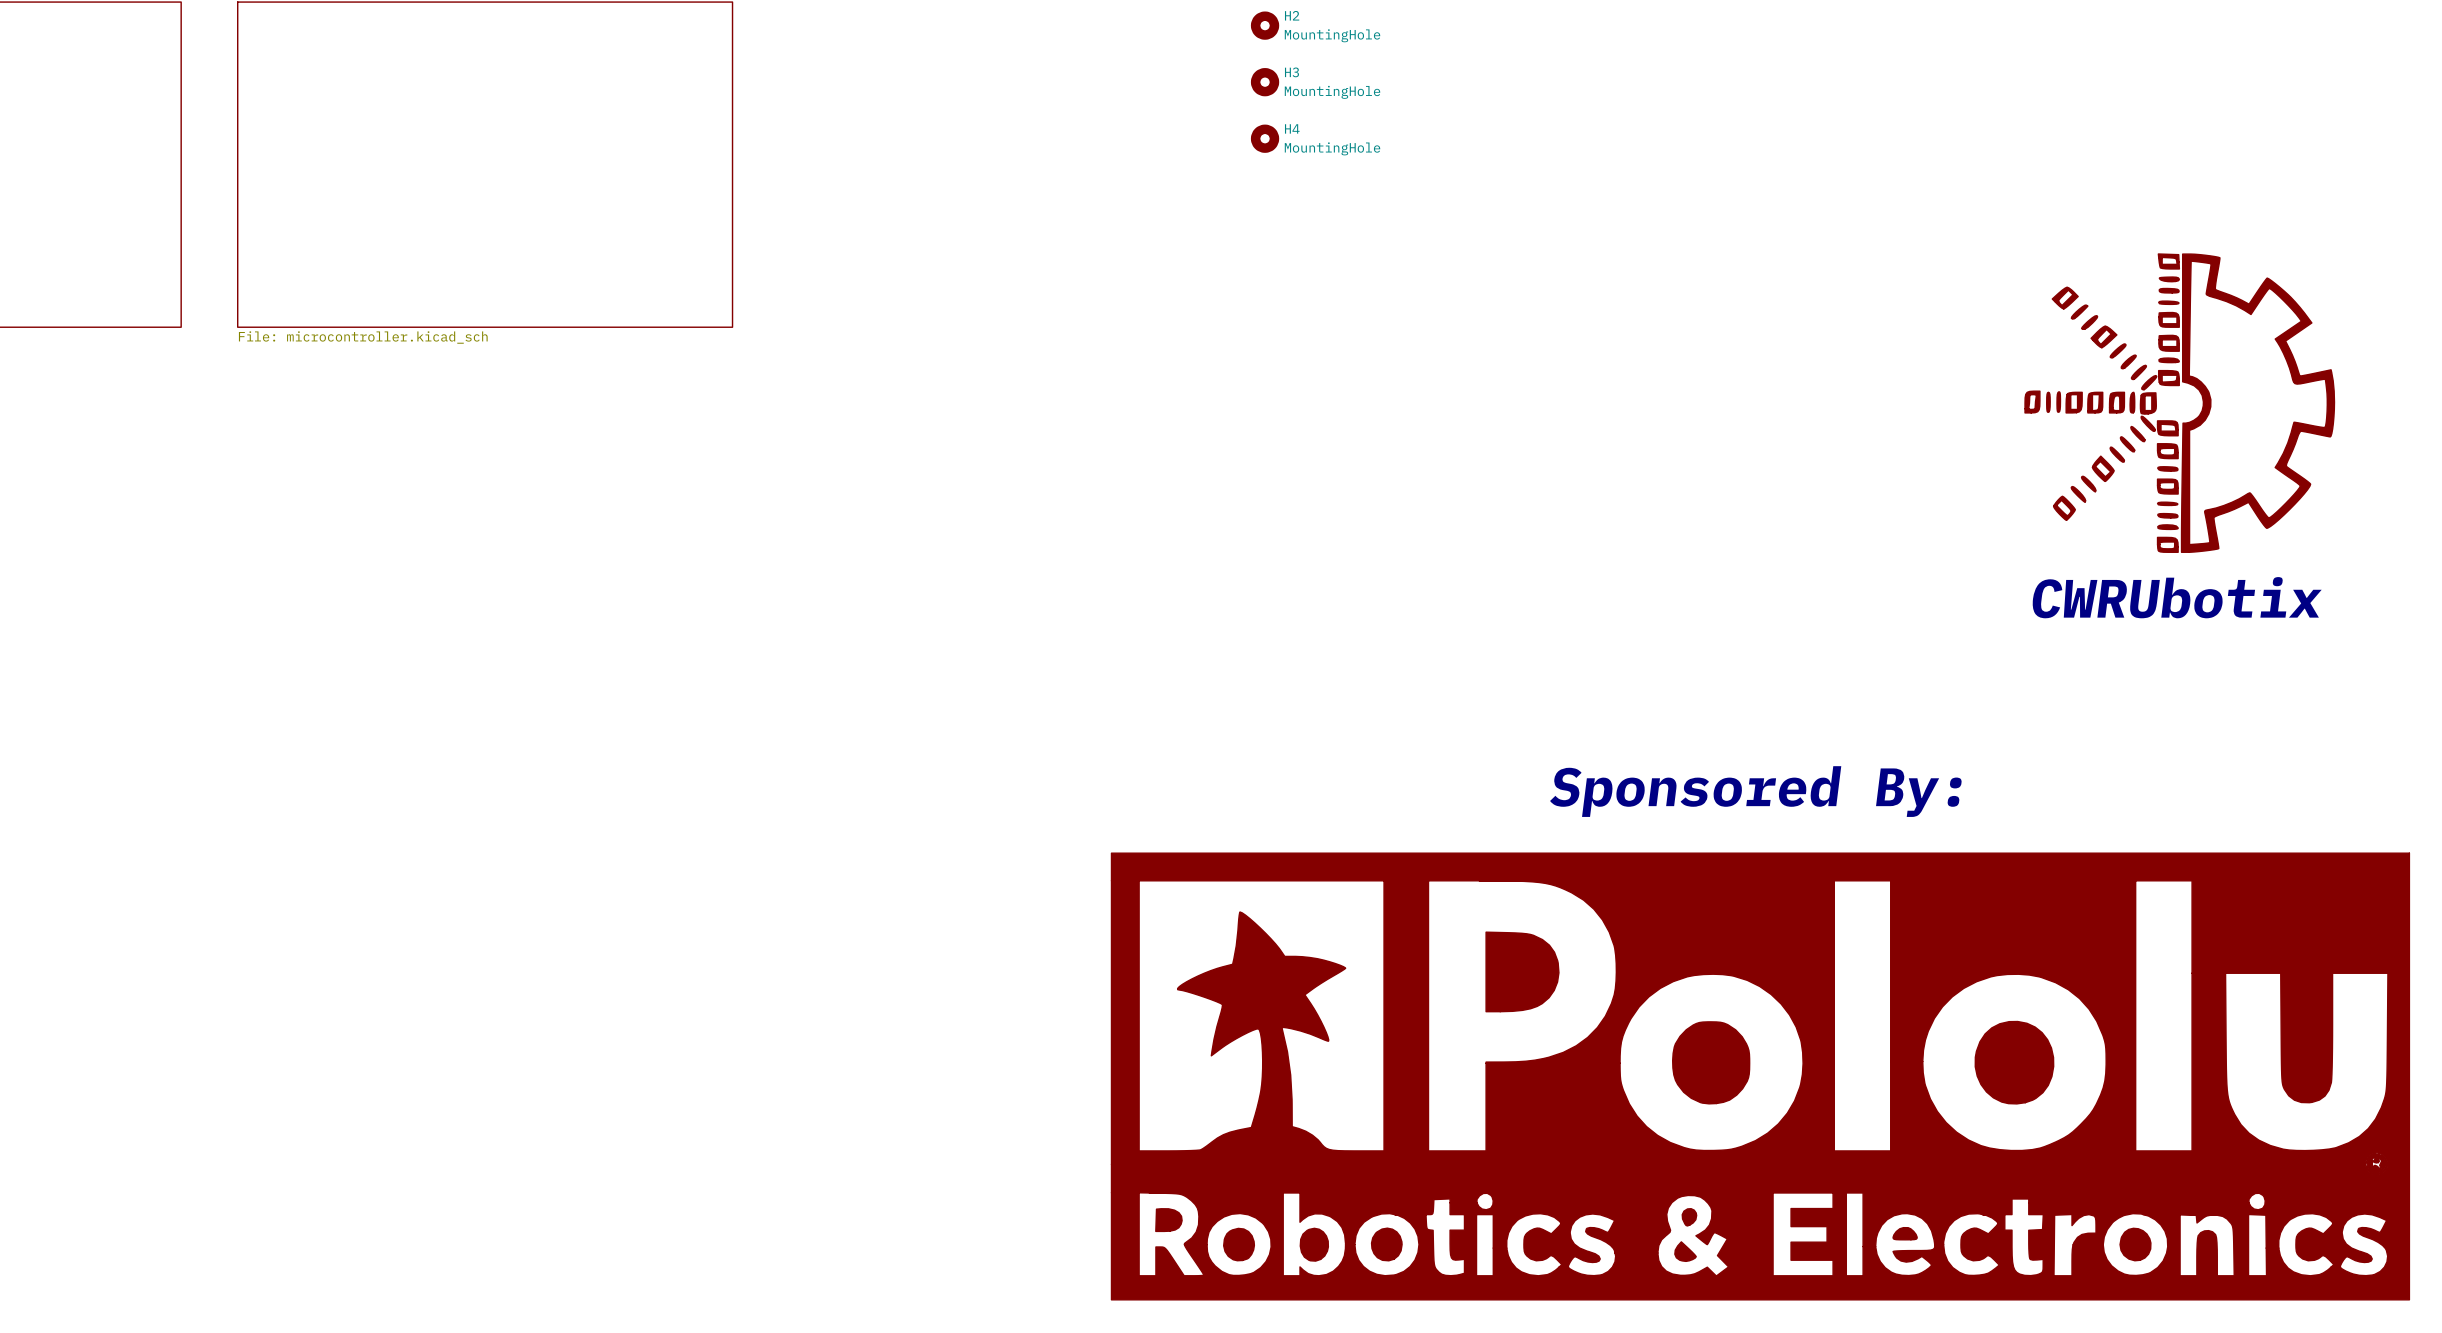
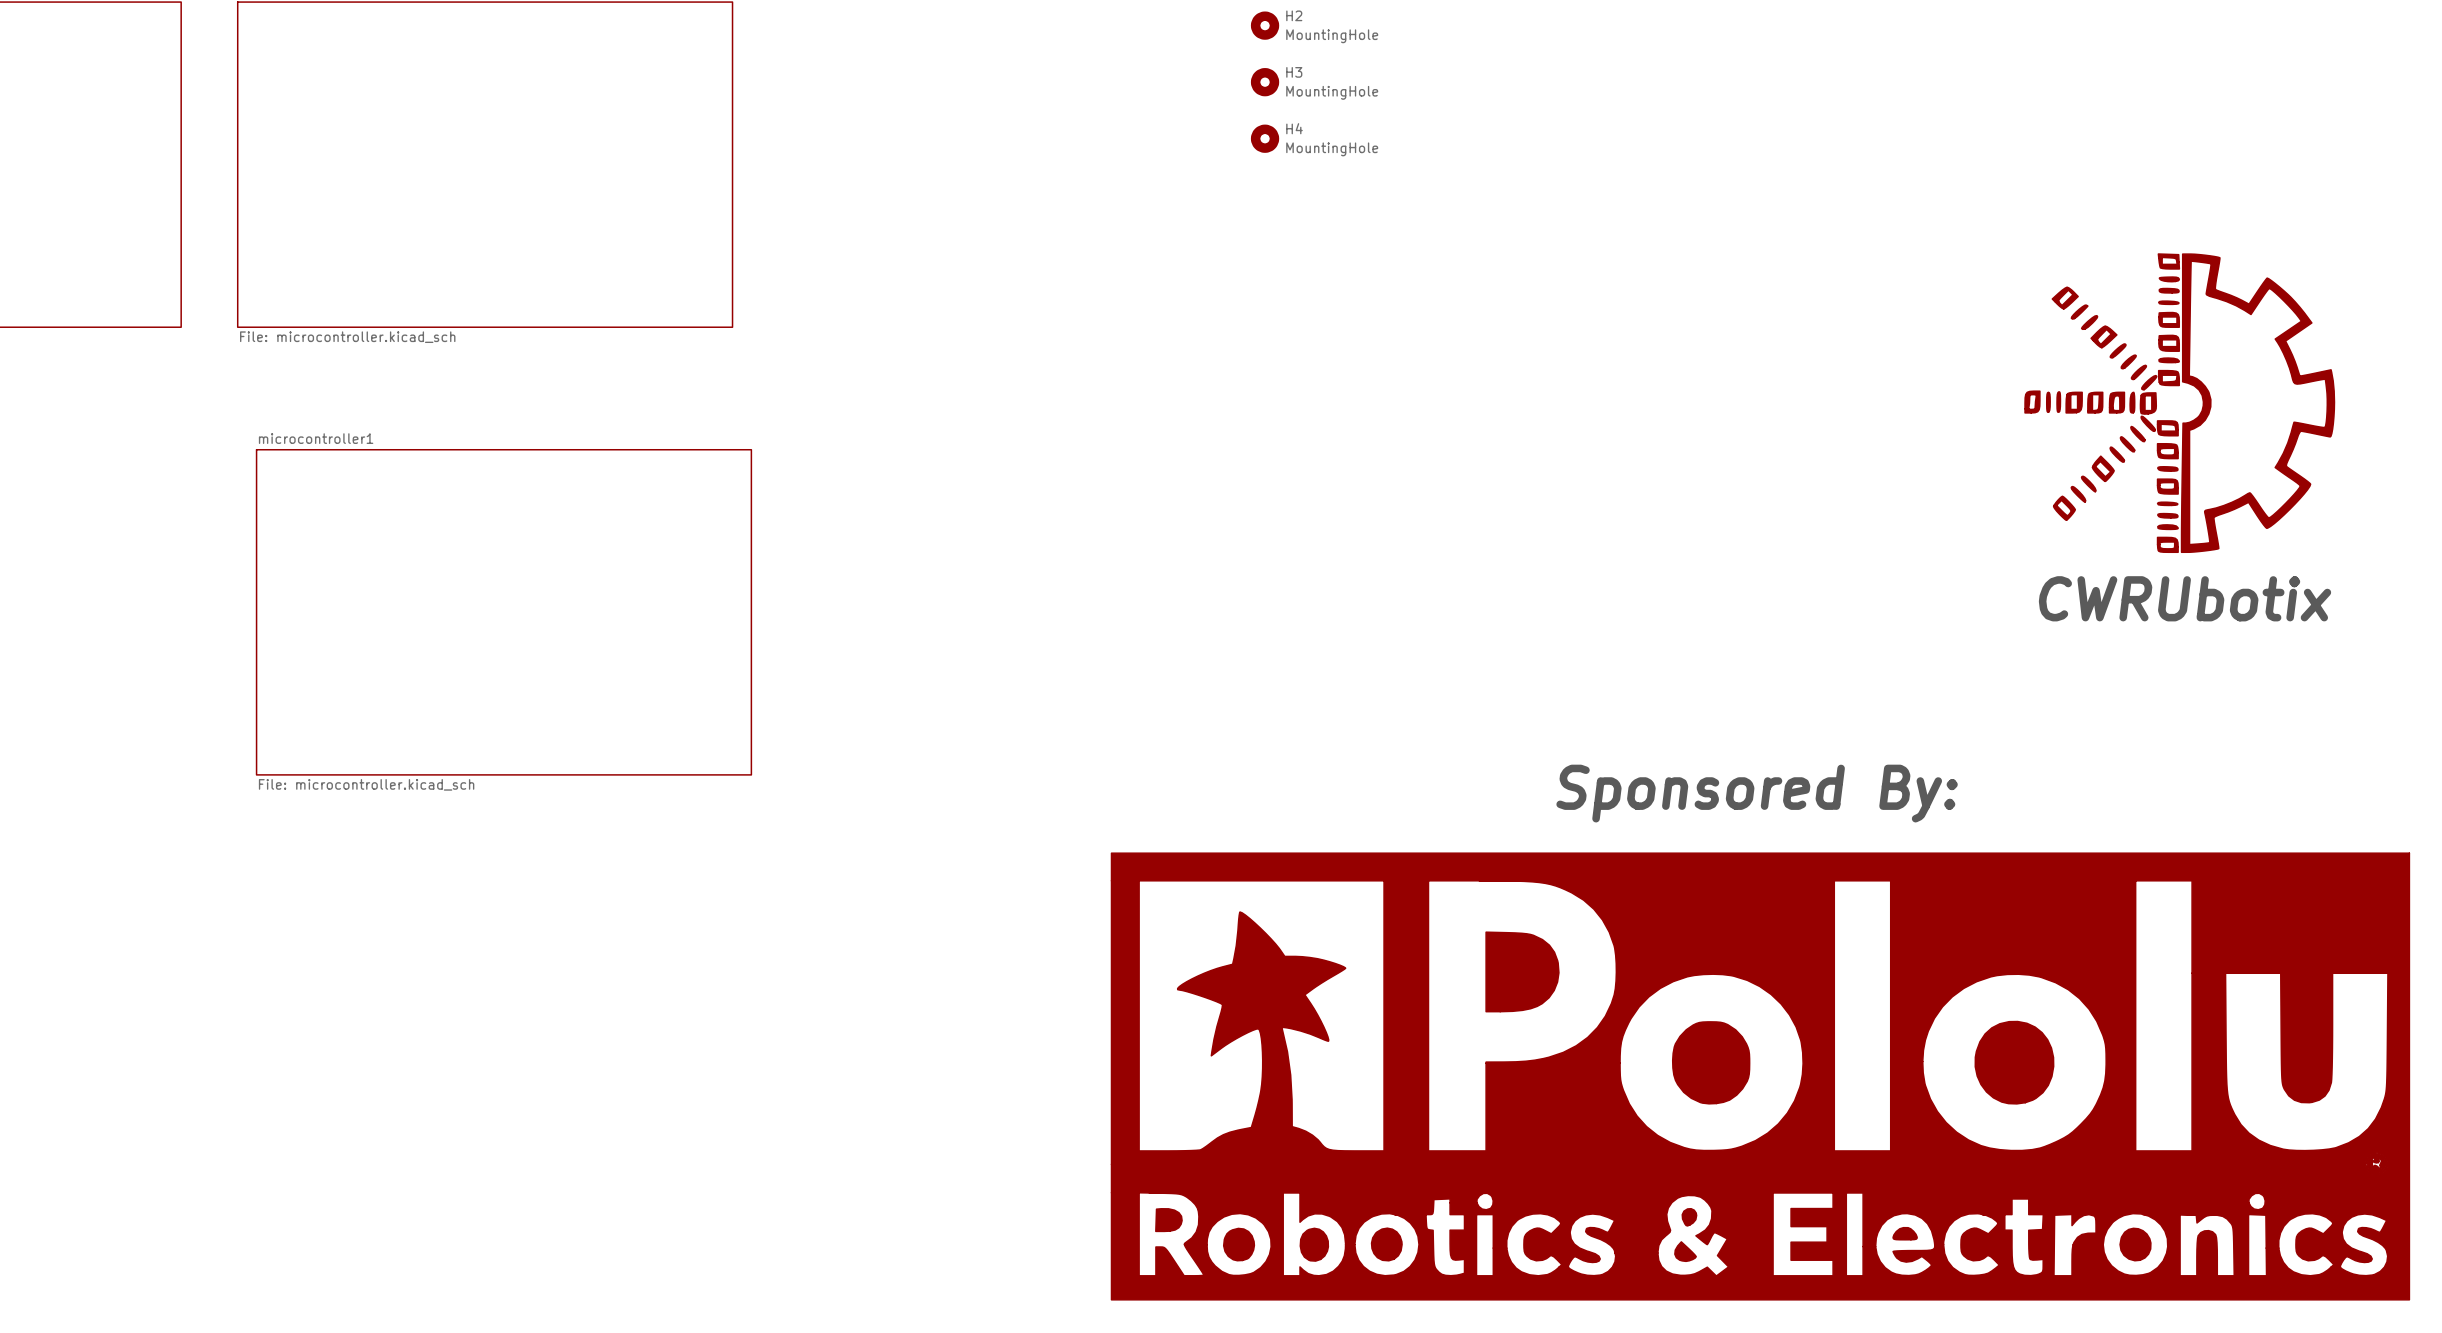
sheet microcontroller1: none -> File: microcontroller.kicad_sch (503, 612)

